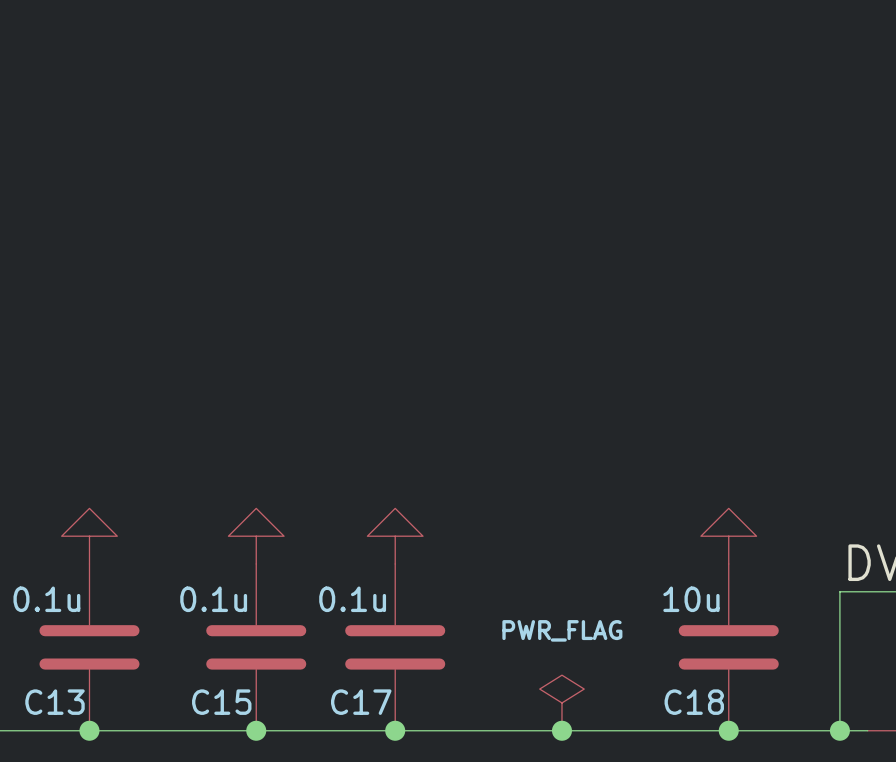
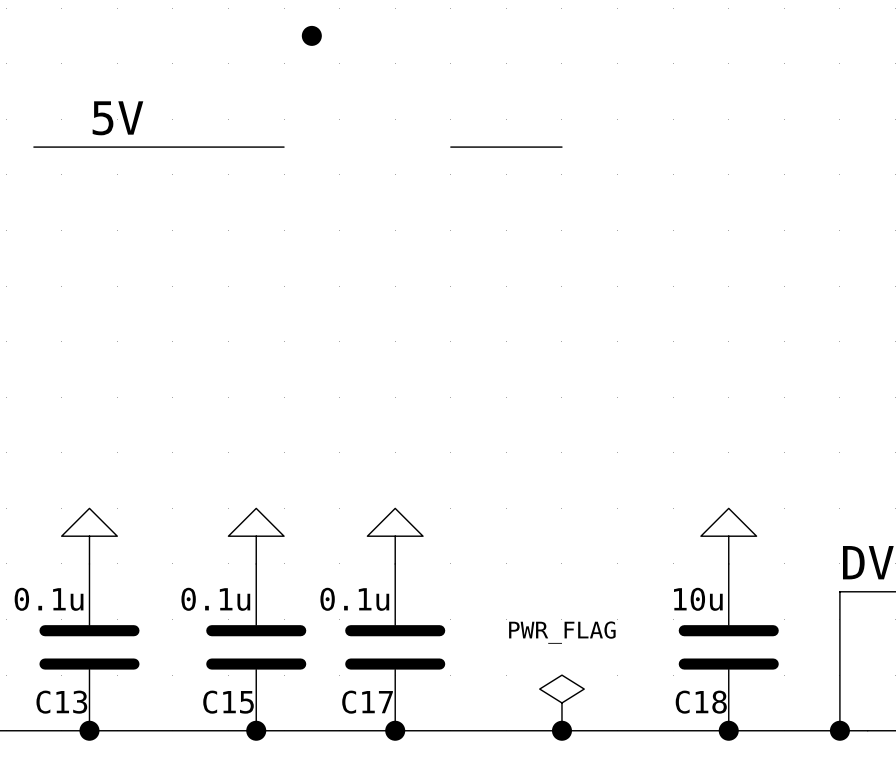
junction: none -> (311, 35)
label: none -> 5V (117, 118)
wire: none -> (33, 147) (284, 147)
wire: none -> (450, 147) (561, 147)

